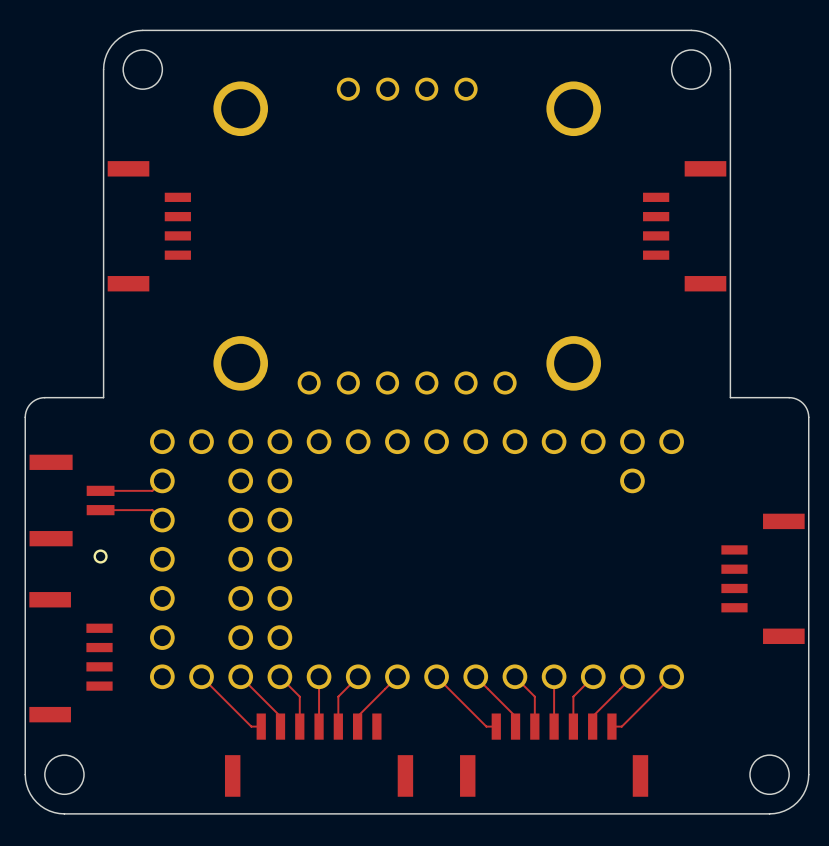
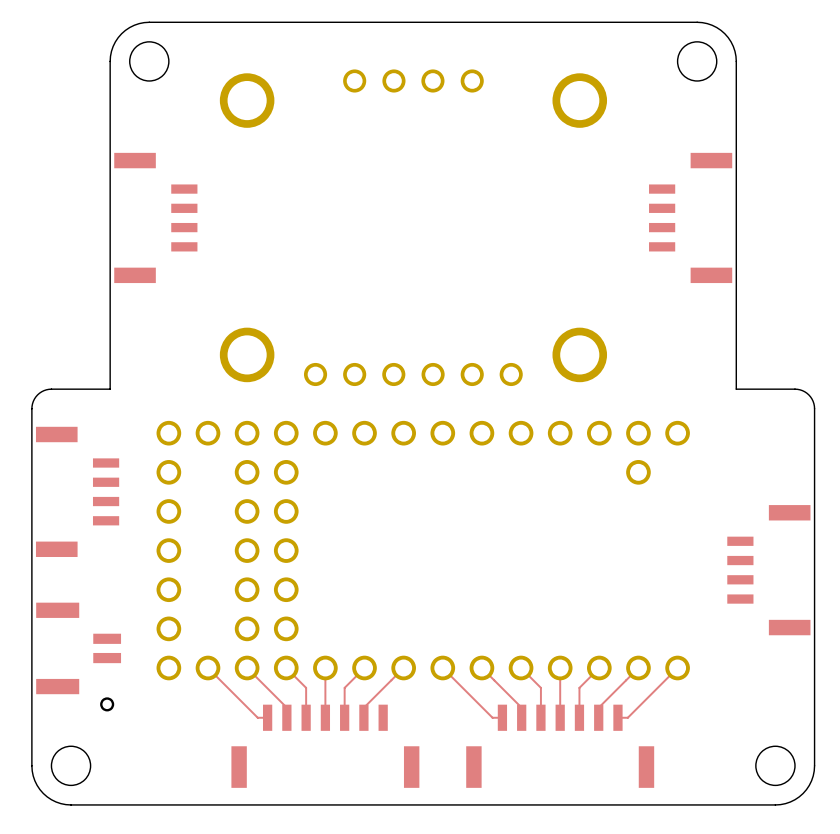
part footprint: [29, 454, 115, 564] -> [35, 426, 120, 557]
top track: (162, 480) (152, 490) (100, 490) -> none
top track: (100, 510) (152, 510) (162, 520) -> none
part footprint: [29, 592, 113, 723] -> [36, 602, 122, 712]

